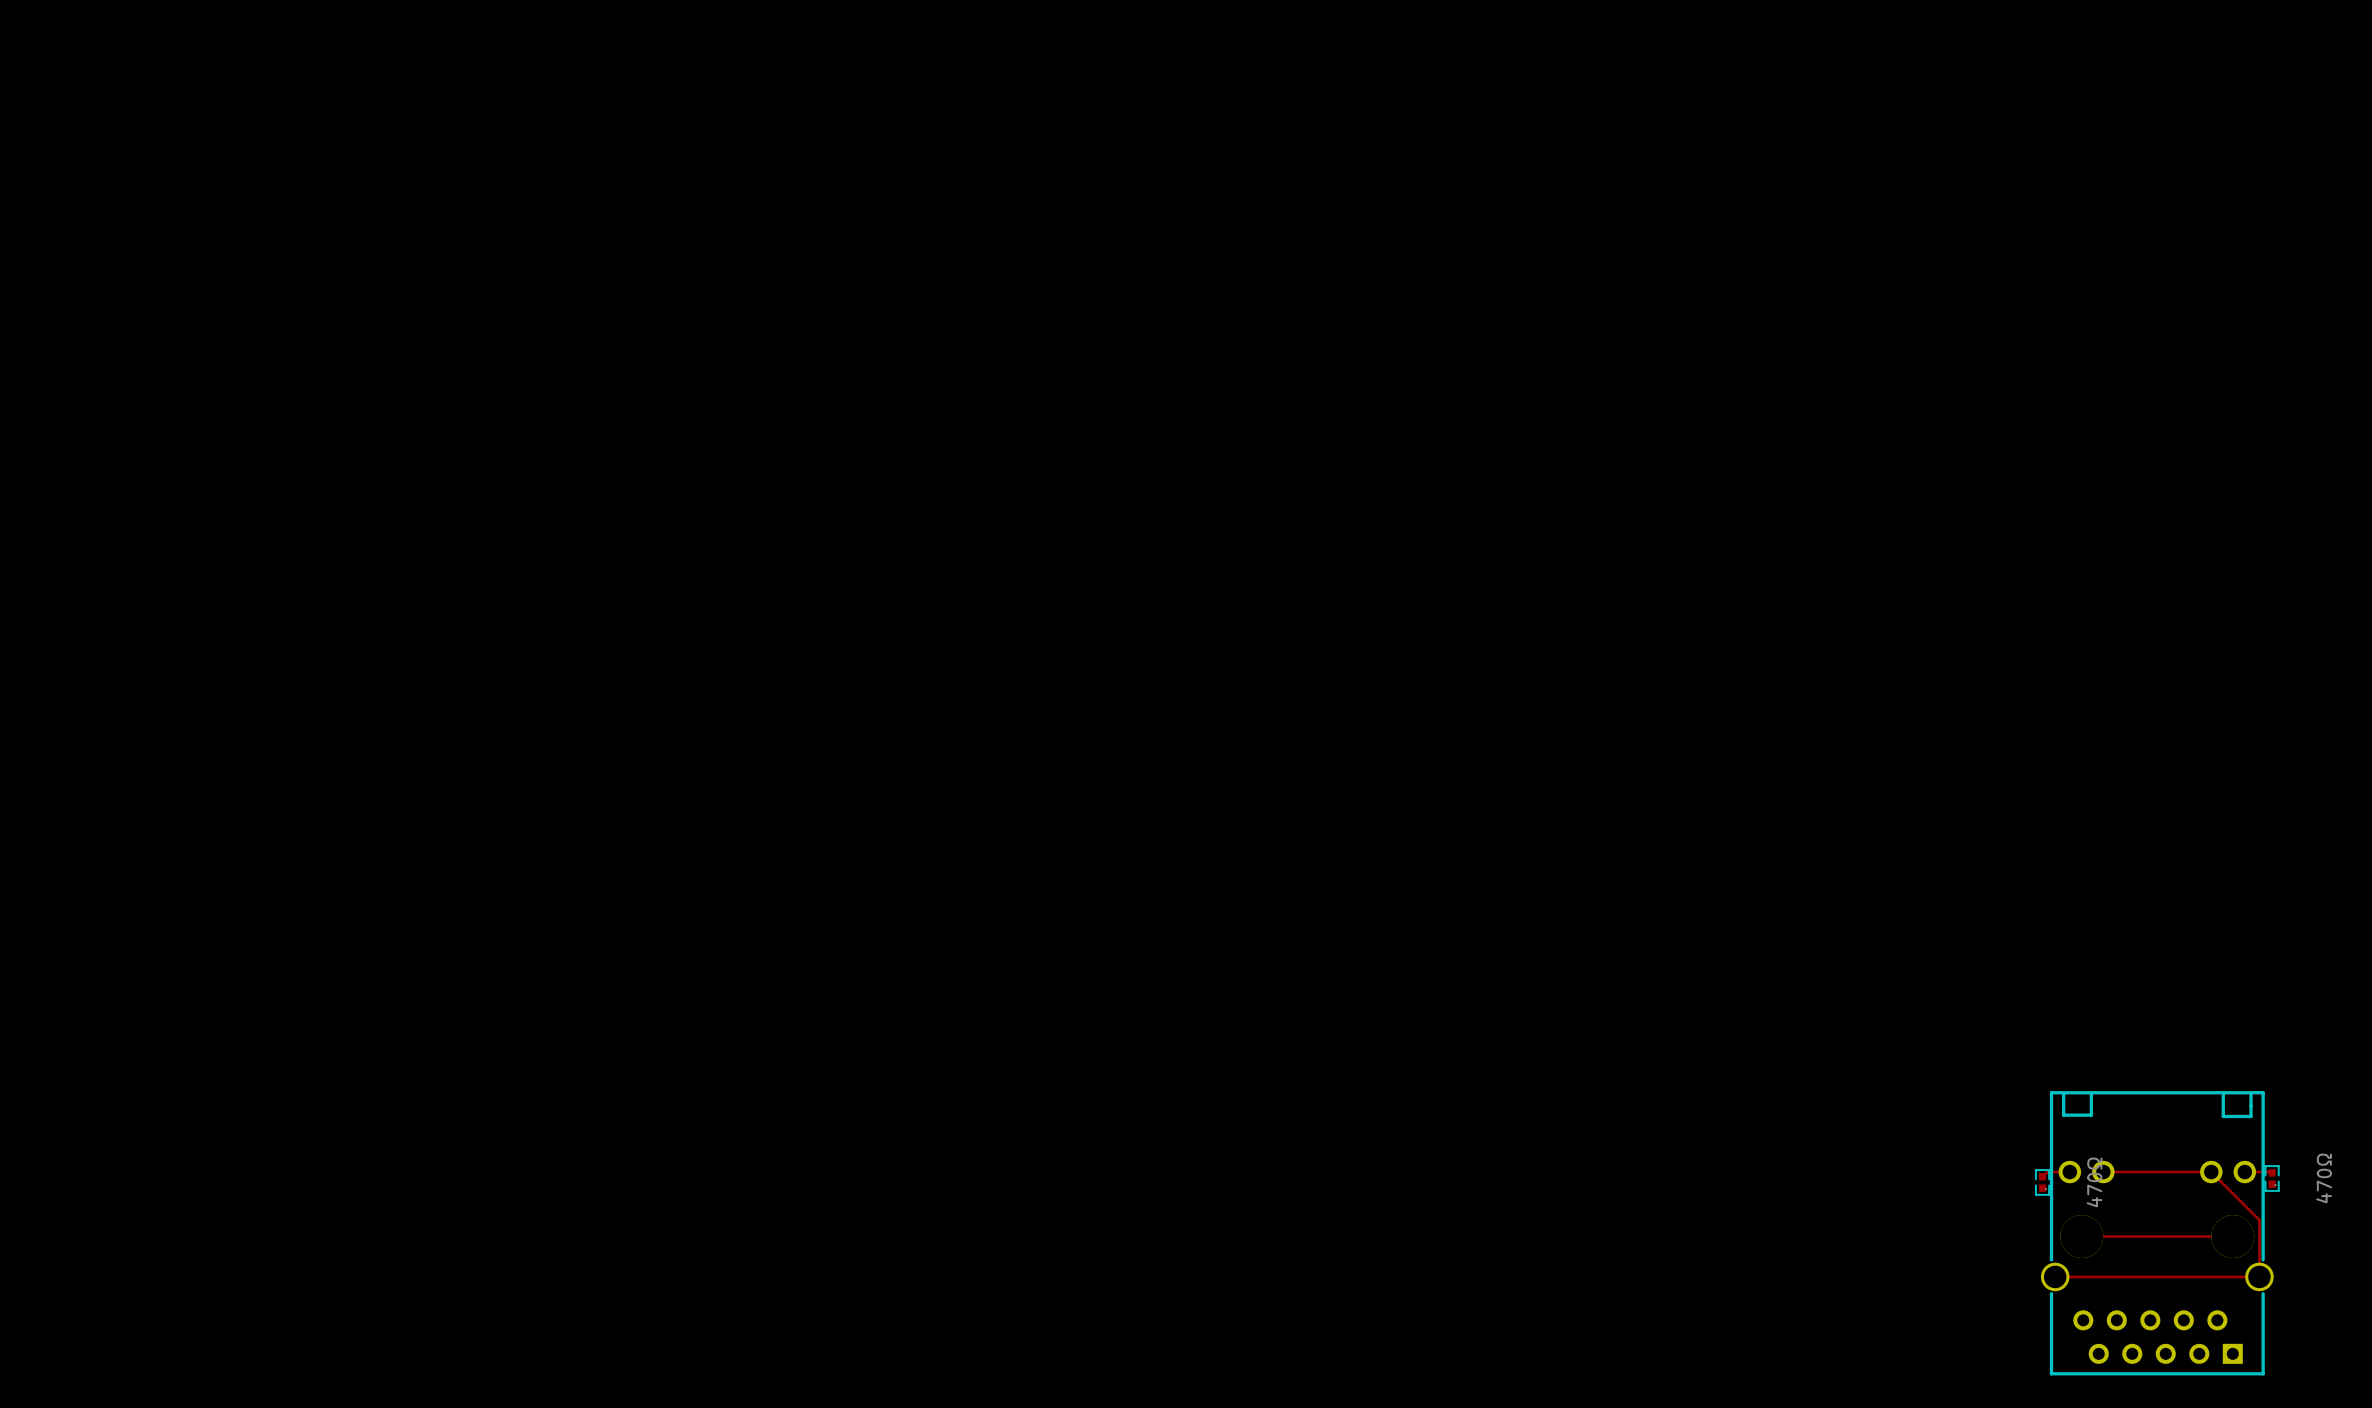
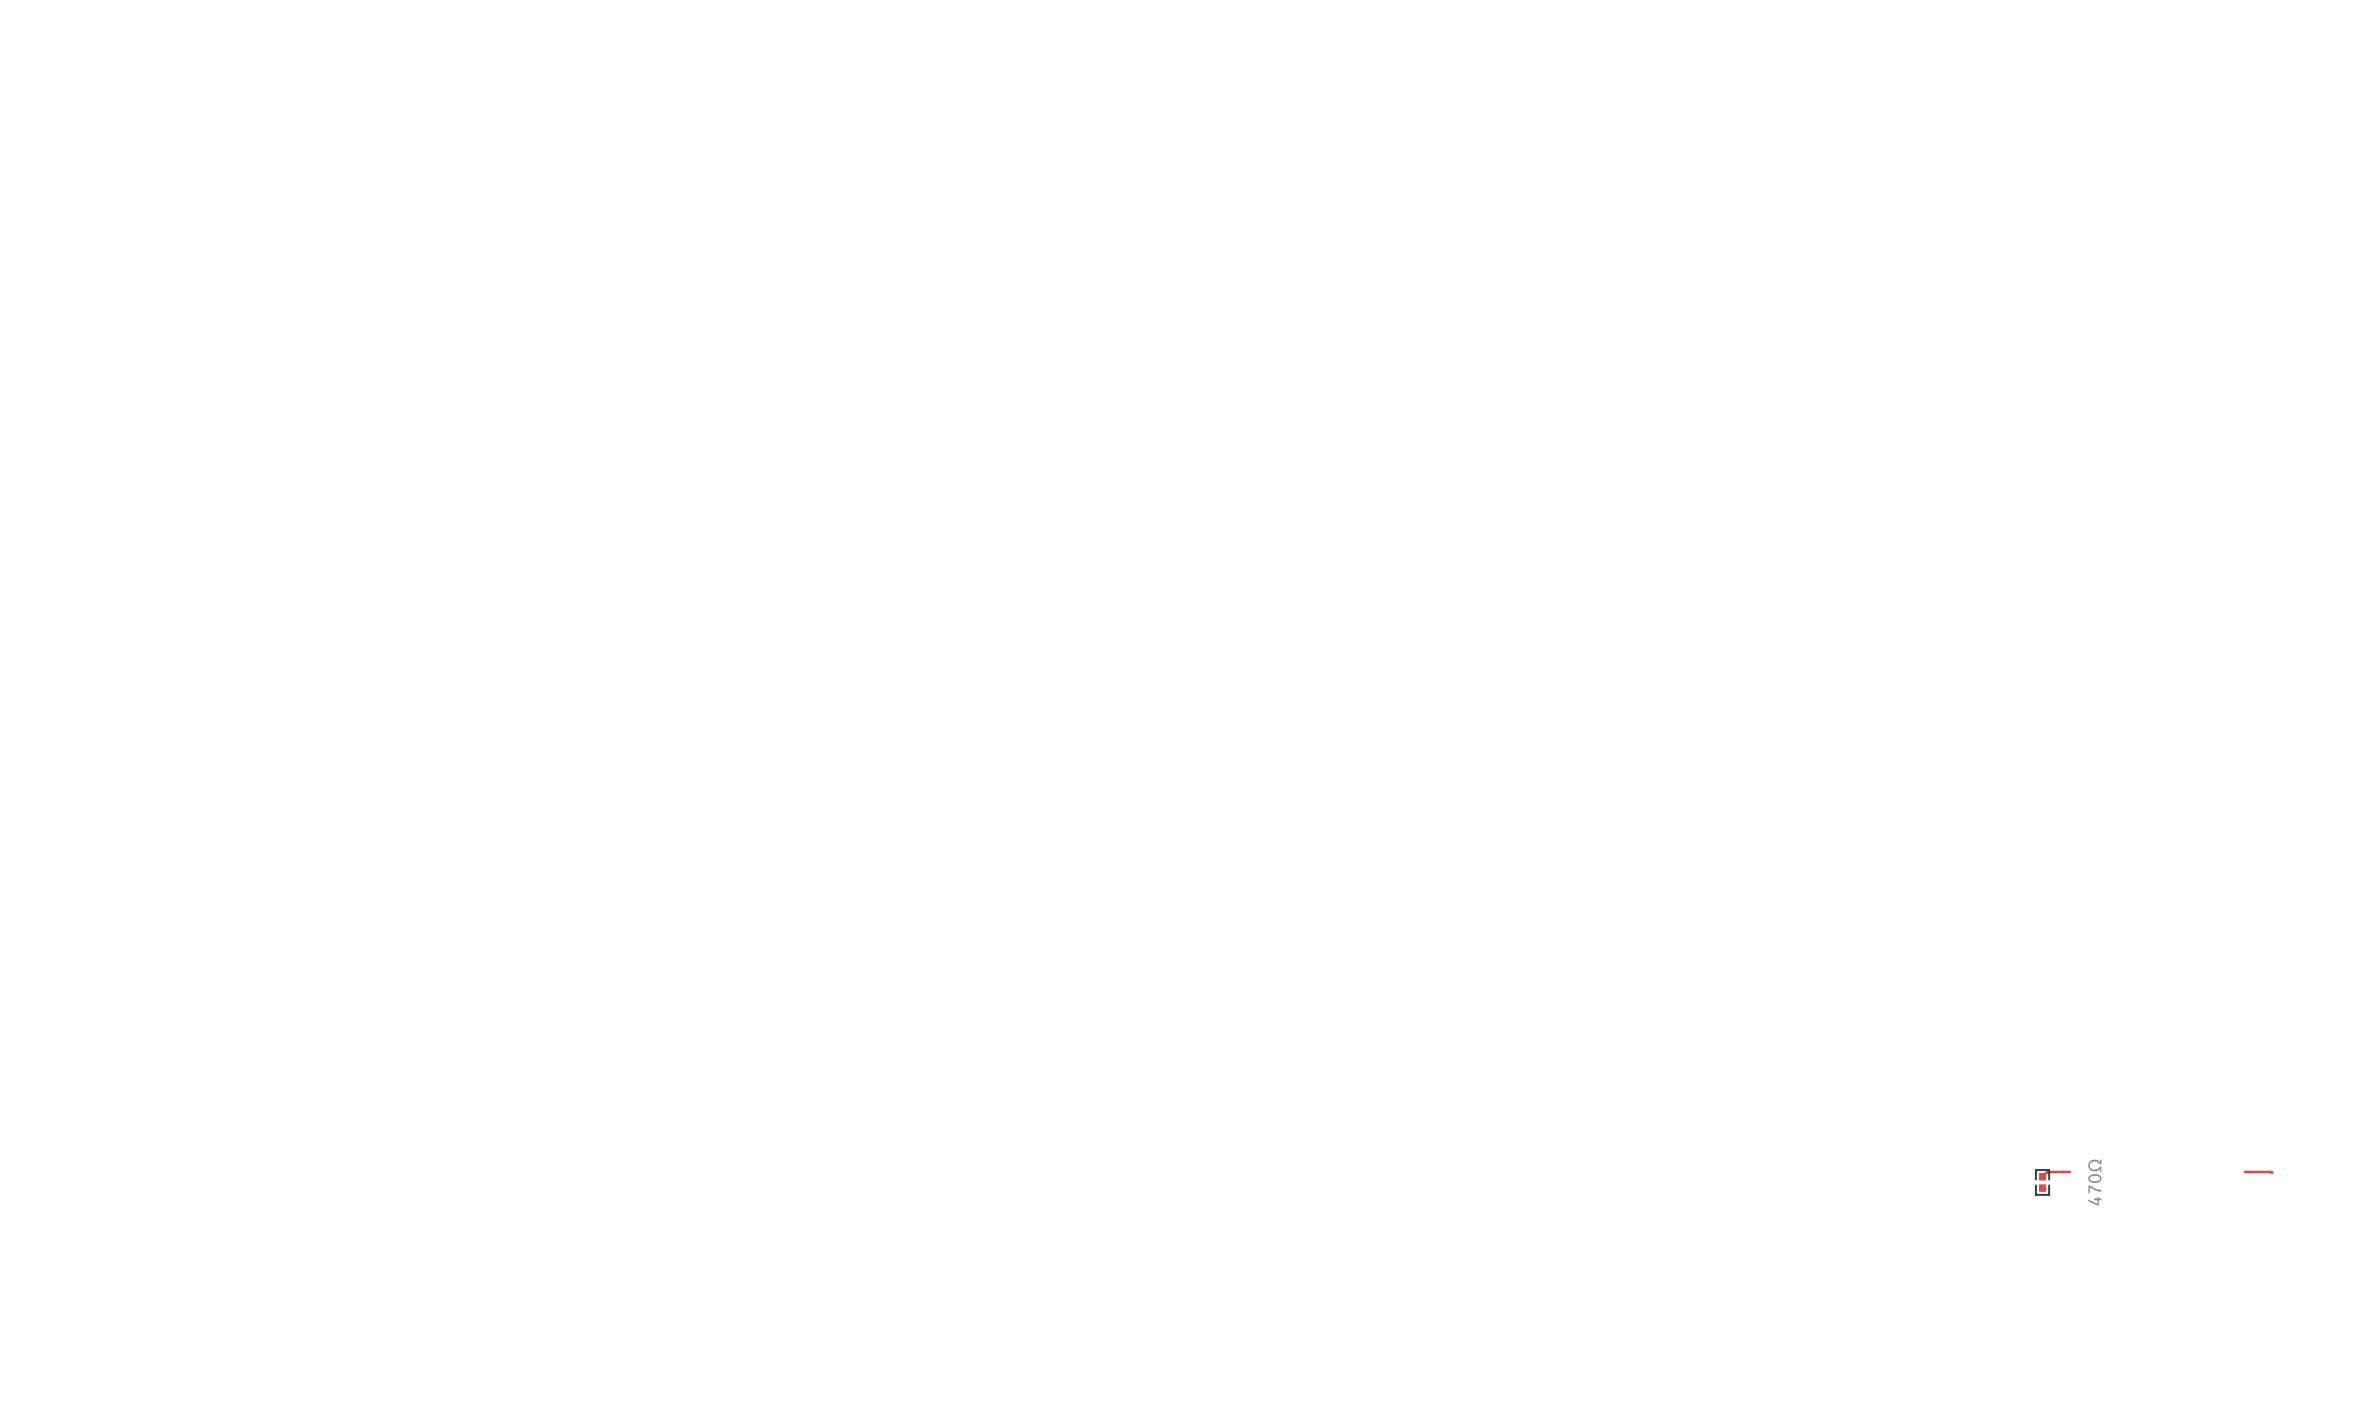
top track: (2103, 1172) (2211, 1172) (2259, 1220) (2259, 1276) (2055, 1276) -> none
part: 470Ω (2272, 1178) -> none
part: (2157, 1233) -> none
top track: (2081, 1236) (2232, 1236) -> none

